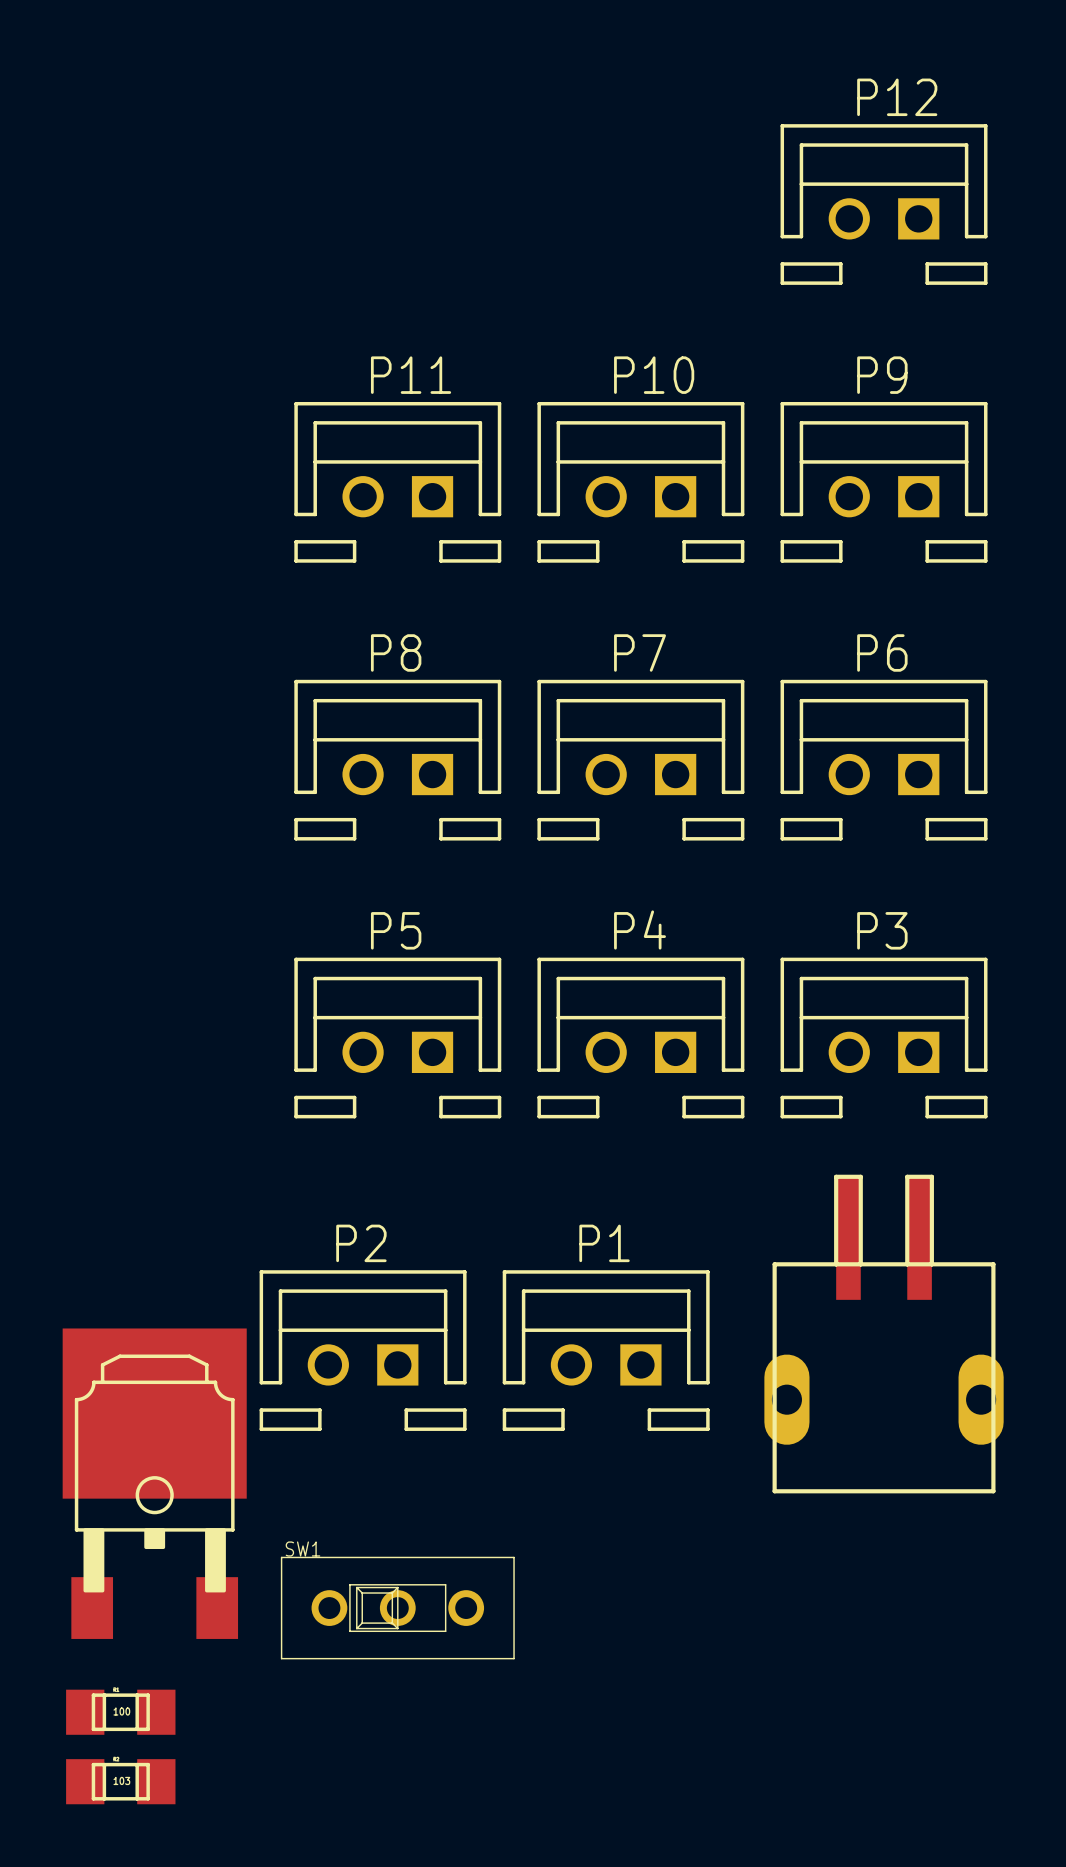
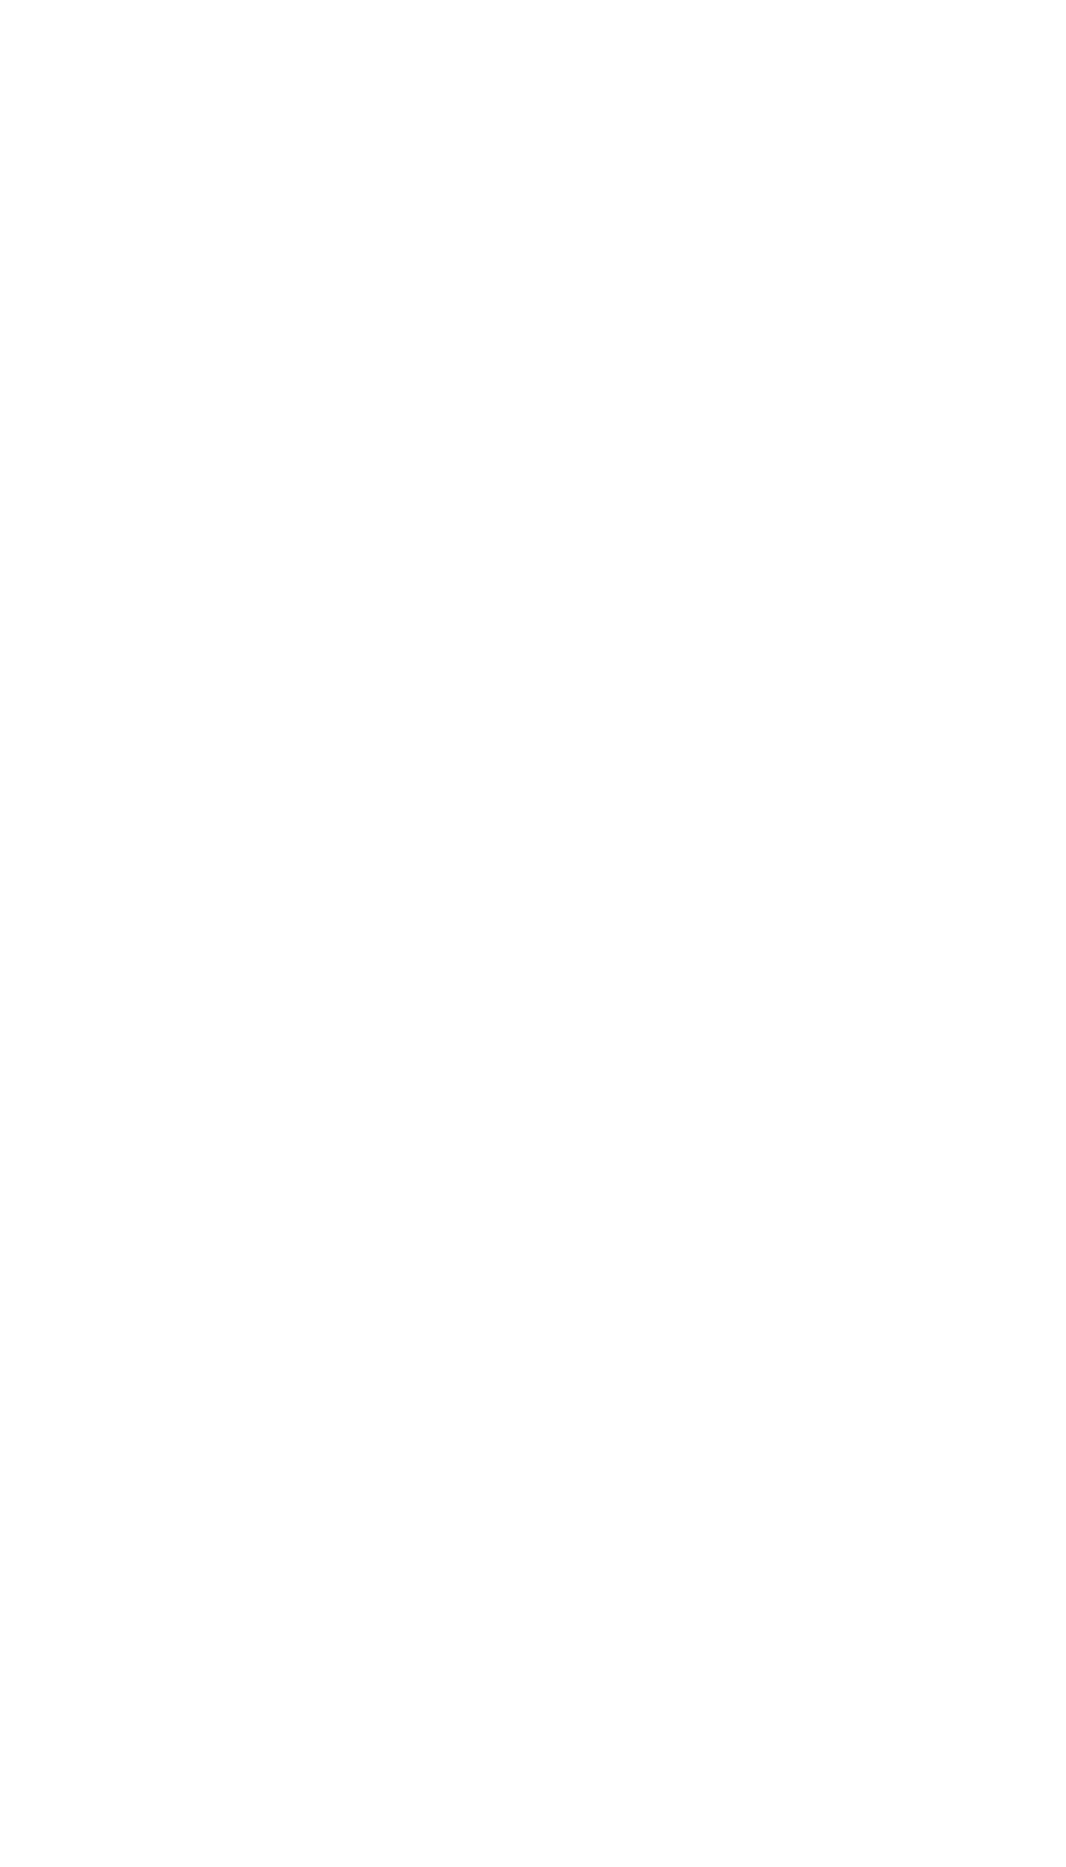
P12: (884, 204) -> none
P11: (397, 482) -> none
P10: (640, 482) -> none
P9: (884, 482) -> none
P8: (397, 760) -> none
P7: (640, 760) -> none
P6: (884, 760) -> none
P5: (397, 1038) -> none
P4: (640, 1038) -> none
P3: (884, 1038) -> none
part: (884, 1334) -> none
P2: (363, 1350) -> none
P1: (606, 1350) -> none
part: (154, 1483) -> none
SW1: (397, 1608) -> none
part: (120, 1712) -> none
part: (120, 1781) -> none

